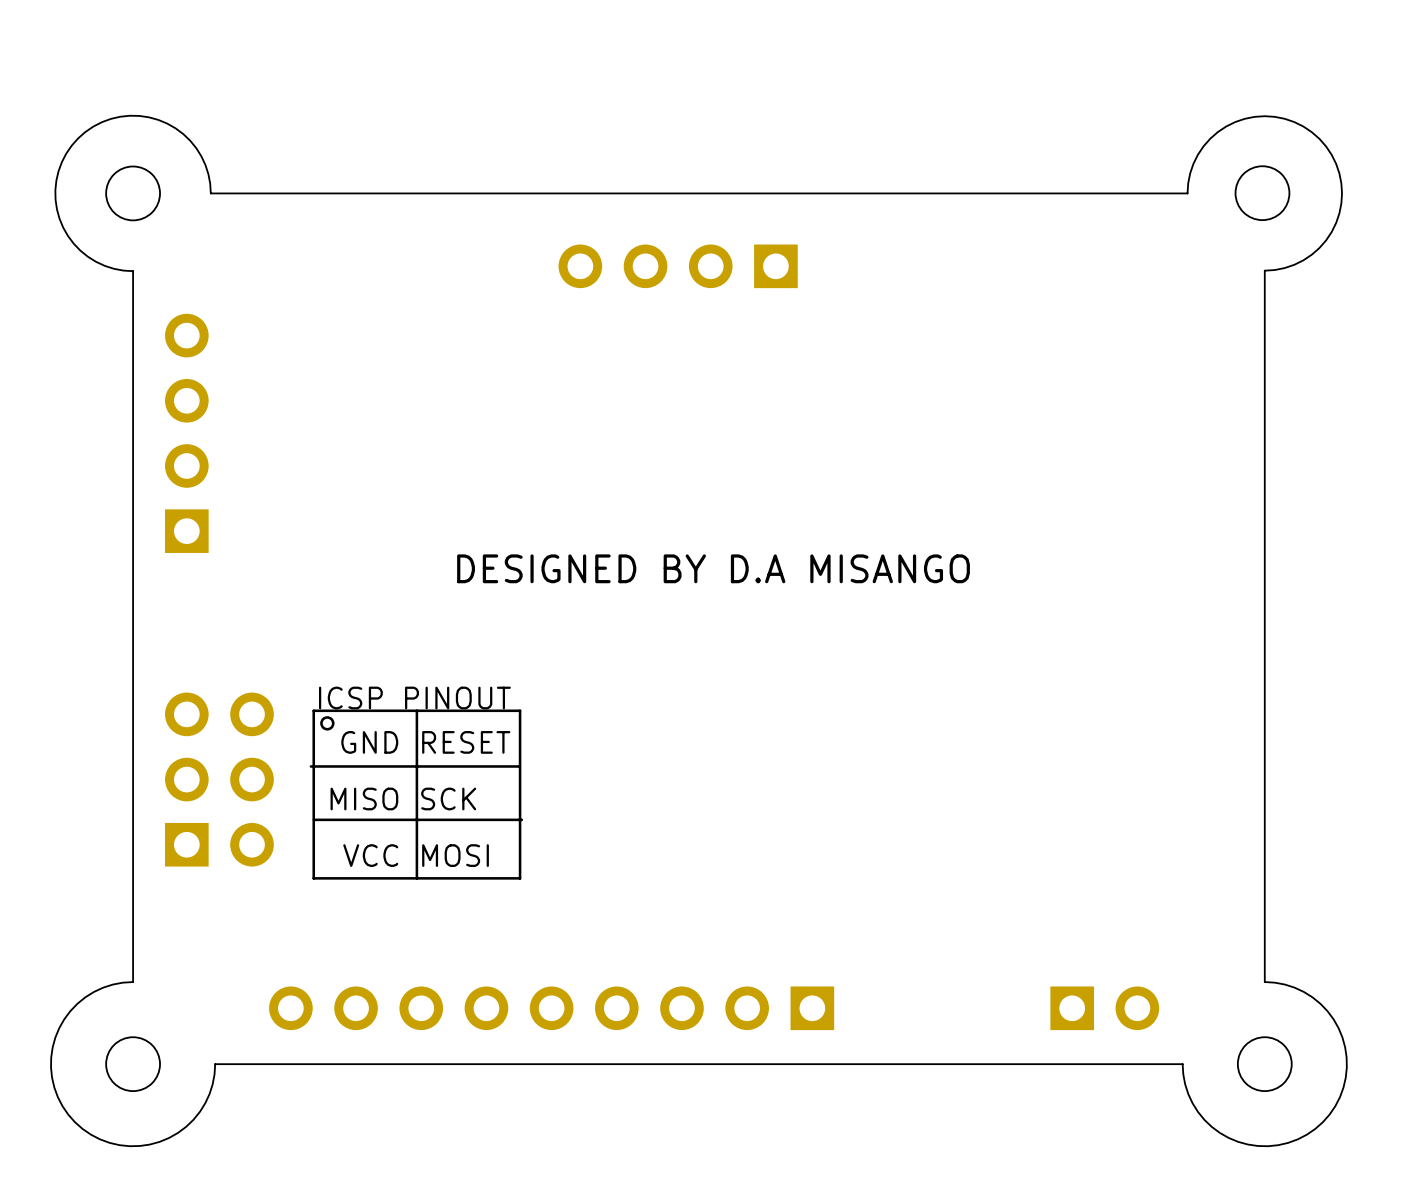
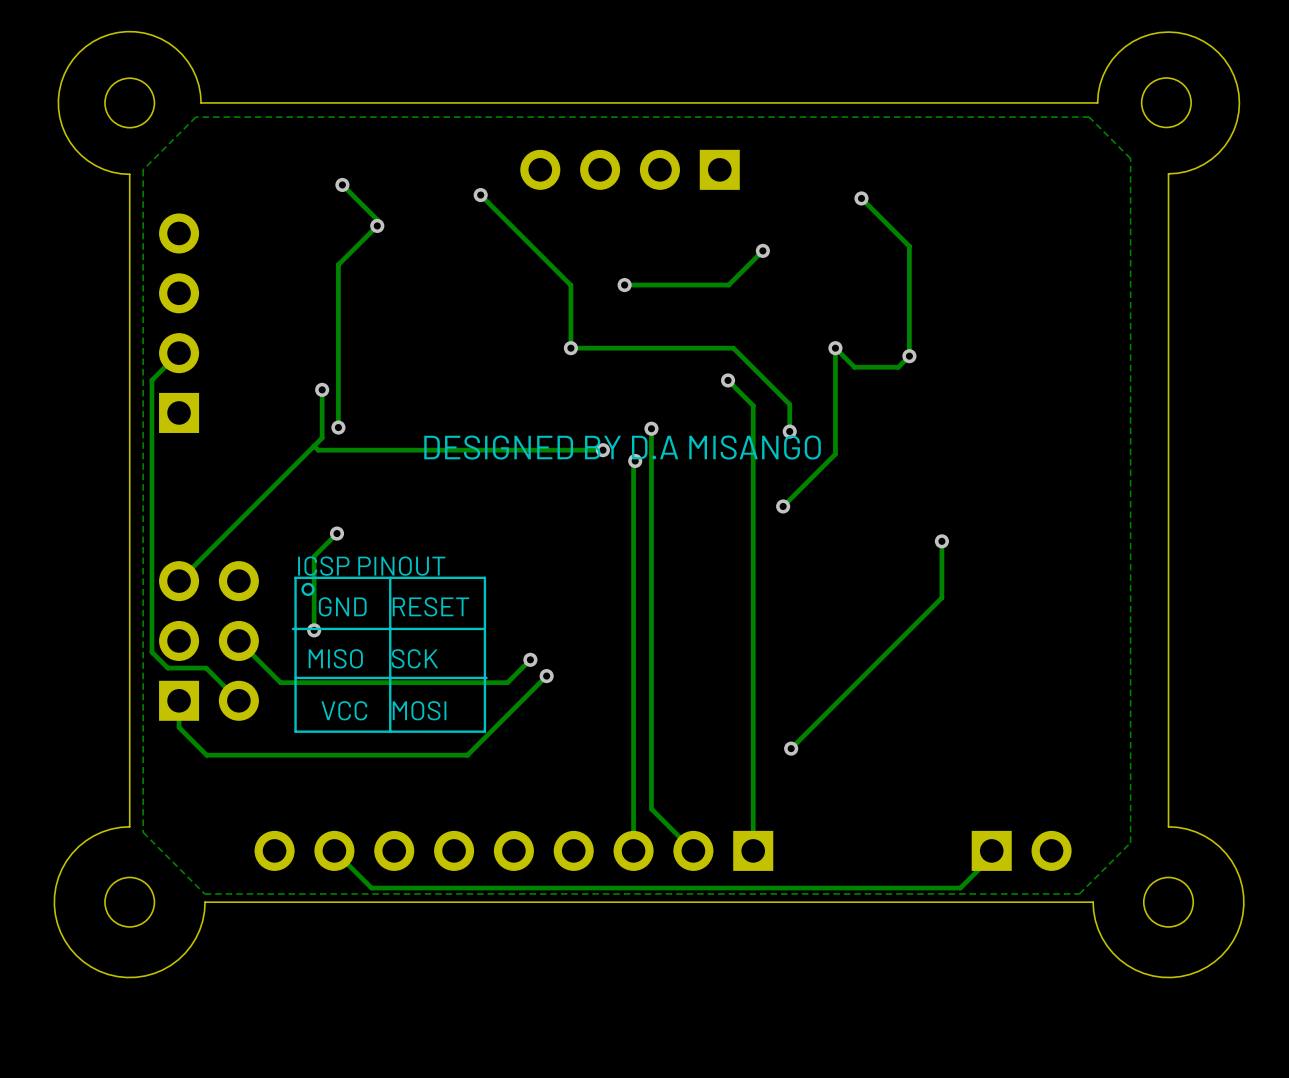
zone outline: none -> (1089, 117) (1130, 158) (1130, 842) (1079, 893) (204, 893) (143, 832) (143, 169) (195, 117) (1089, 117)
track: none -> (342, 184) (377, 219) (377, 225) (338, 264) (338, 427)
via: none -> (342, 184)
track: none -> (480, 195) (570, 285) (570, 348) (733, 348) (789, 404) (789, 431)
via: none -> (480, 195)
track: none -> (861, 198) (909, 246) (909, 356) (898, 367) (854, 367) (835, 348) (835, 454) (783, 506)
via: none -> (861, 198)
via: none -> (377, 225)
track: none -> (762, 250) (728, 285) (624, 285)
via: none -> (762, 250)
via: none -> (624, 285)
via: none -> (570, 348)
via: none -> (835, 348)
track: none -> (179, 353) (151, 380) (151, 652) (167, 668) (206, 668) (238, 700)
via: none -> (909, 356)
track: none -> (728, 380) (753, 405) (753, 850)
via: none -> (728, 380)
track: none -> (322, 389) (322, 438) (179, 581)
via: none -> (322, 389)
via: none -> (338, 427)
track: none -> (651, 428) (651, 808) (693, 850)
via: none -> (651, 428)
via: none -> (789, 431)
track: none -> (314, 446) (318, 450) (602, 450)
via: none -> (602, 450)
track: none -> (635, 461) (633, 462) (633, 850)
via: none -> (635, 461)
via: none -> (783, 506)
track: none -> (337, 533) (314, 556) (314, 630)
via: none -> (337, 533)
track: none -> (941, 541) (941, 597) (791, 748)
via: none -> (941, 541)
via: none -> (314, 630)
track: none -> (238, 640) (280, 682) (507, 682) (530, 659)
via: none -> (530, 659)
track: none -> (546, 676) (467, 755) (206, 755) (179, 727) (179, 700)
via: none -> (546, 676)
via: none -> (791, 748)
track: none -> (999, 848) (960, 888) (371, 888) (334, 850)

